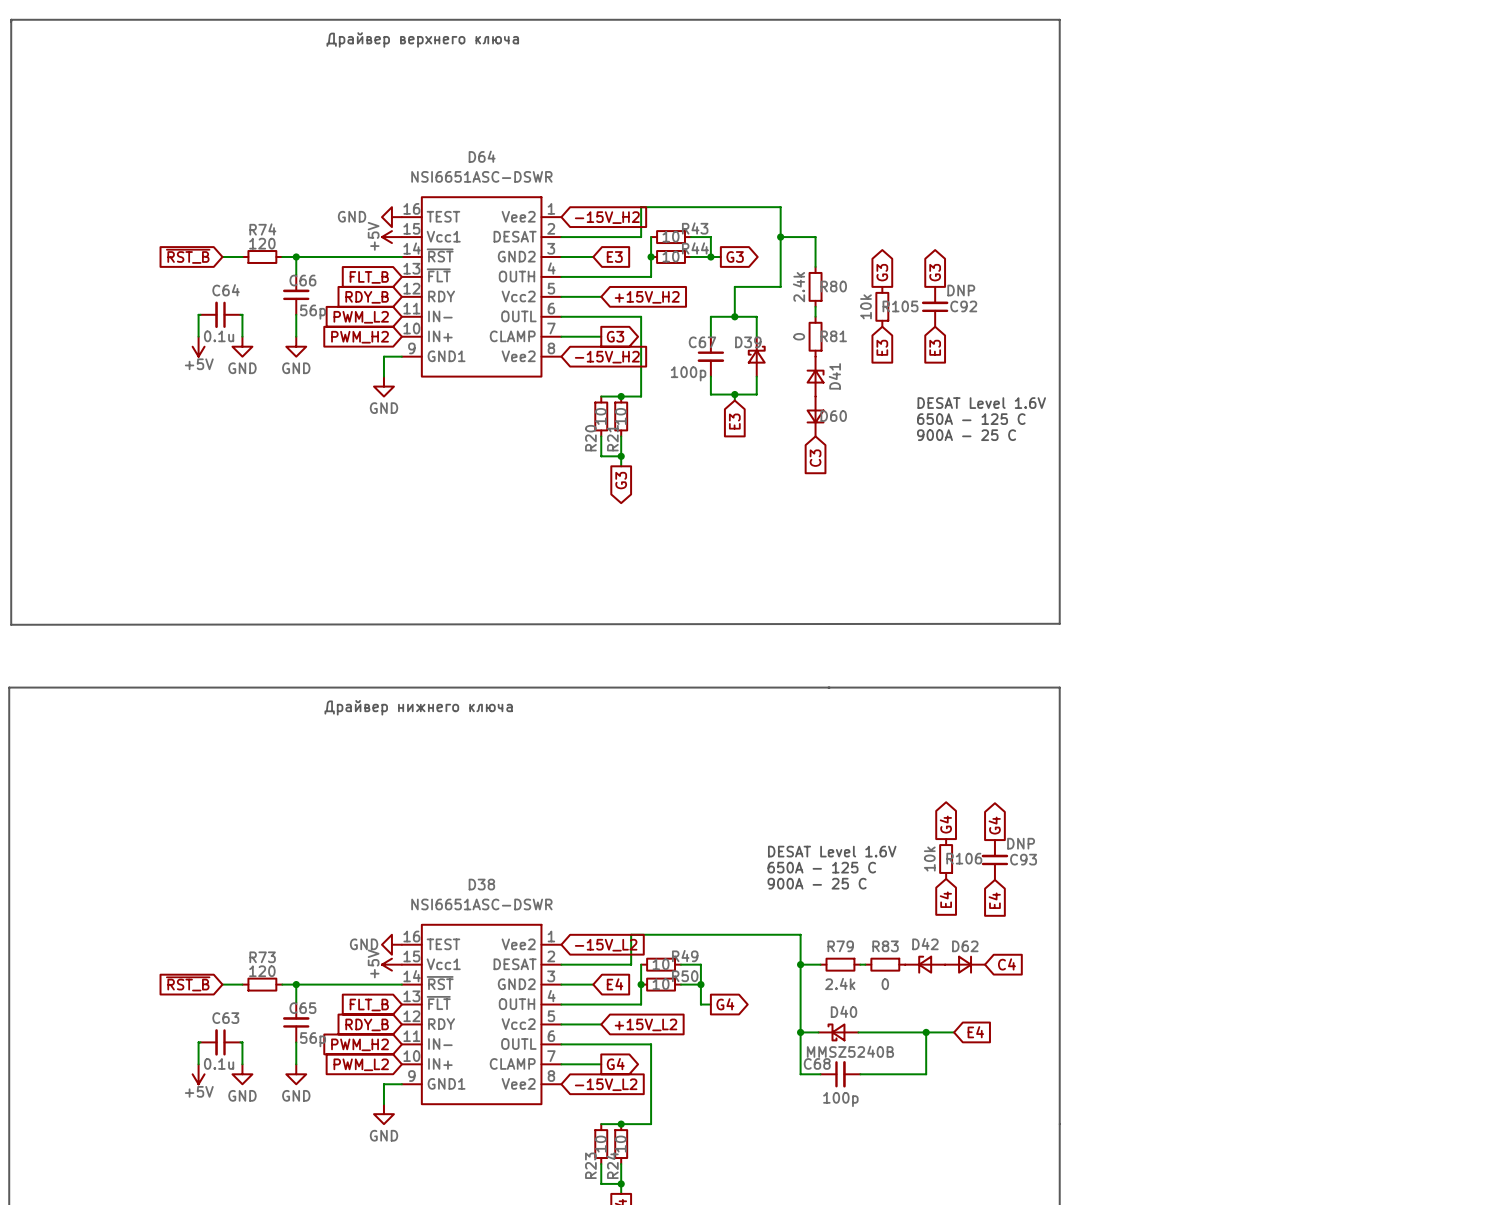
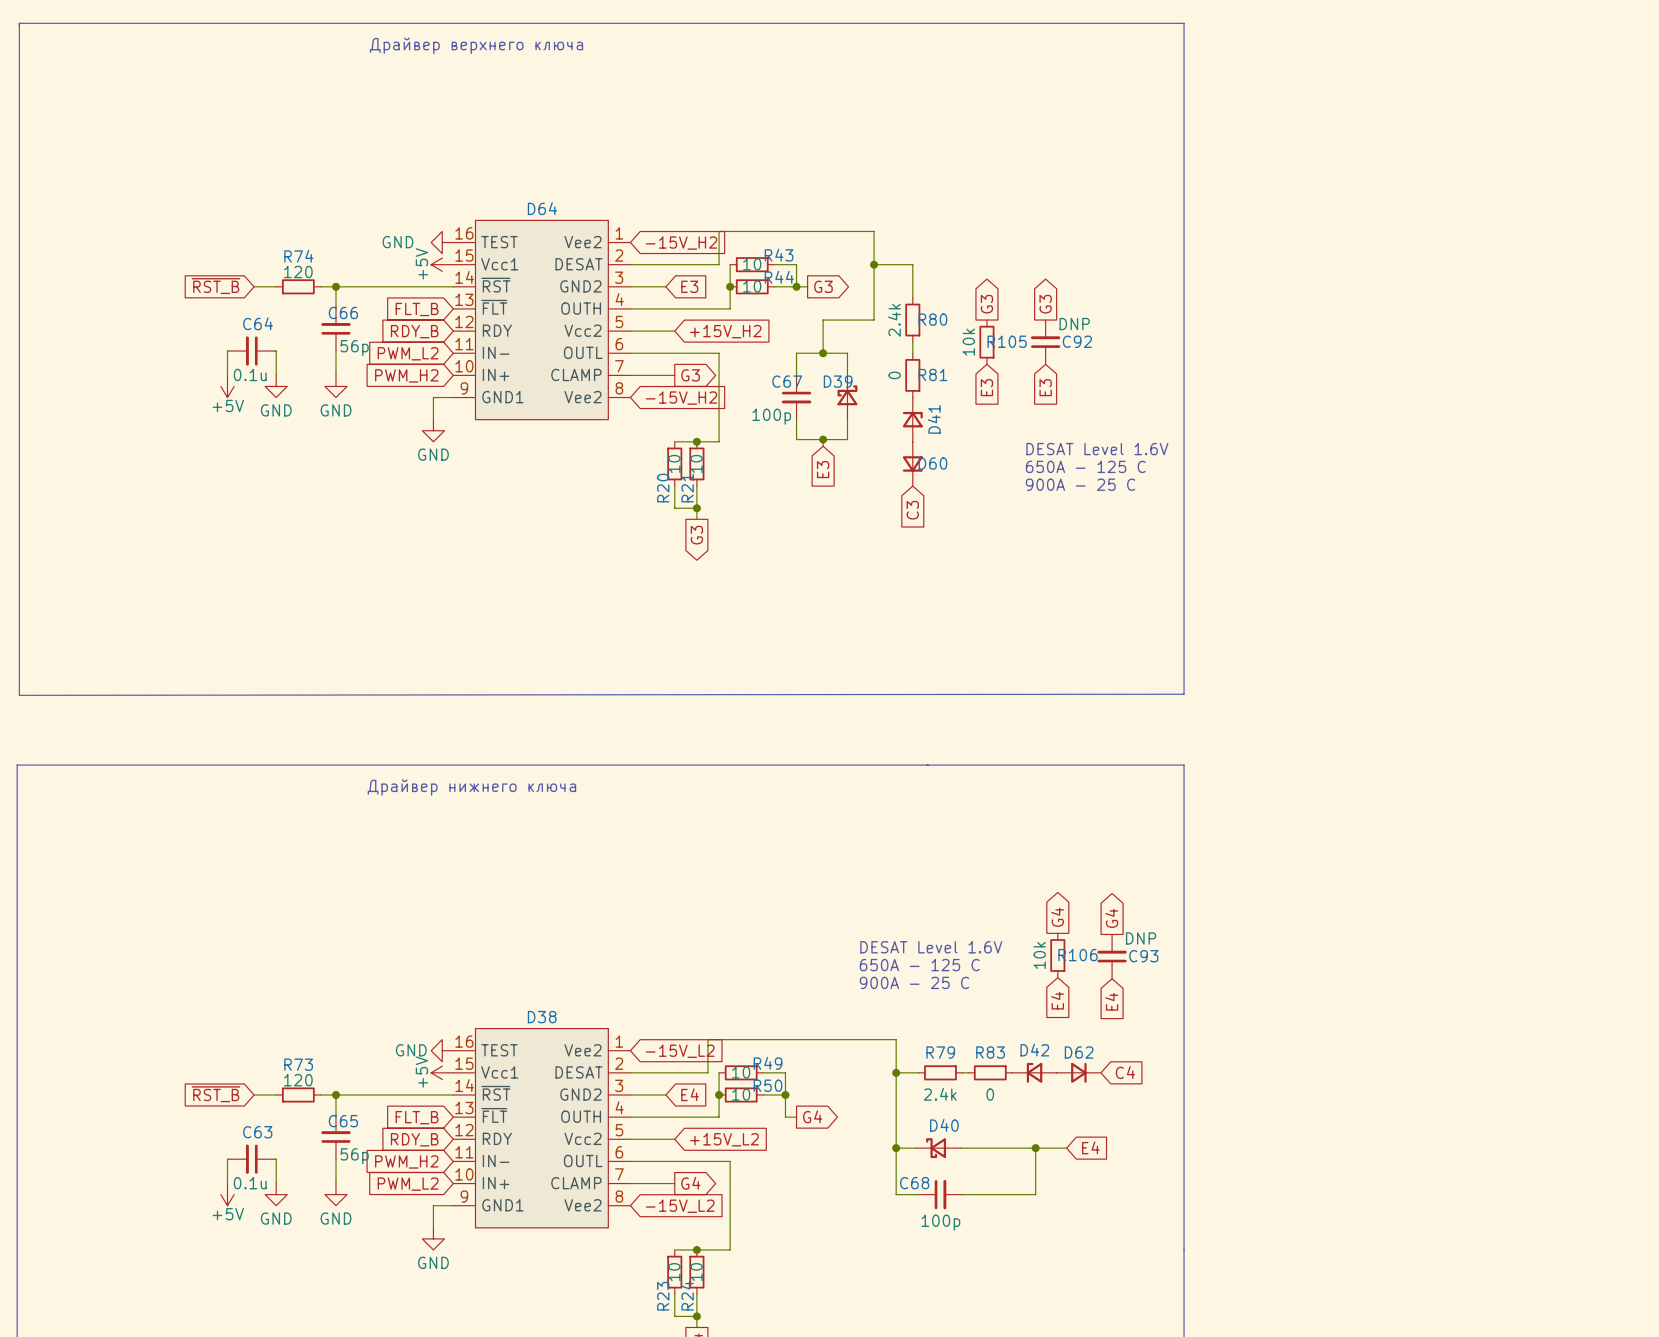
D64 name position: D64 (482, 156) -> D64 (542, 208)
D64 value: NSI6651ASC-DSWR (481, 176) -> none
D38 name position: D38 (481, 884) -> D38 (542, 1017)
D38 value: NSI6651ASC-DSWR (481, 904) -> none
D40 value: MMSZ5240B (850, 1051) -> none

